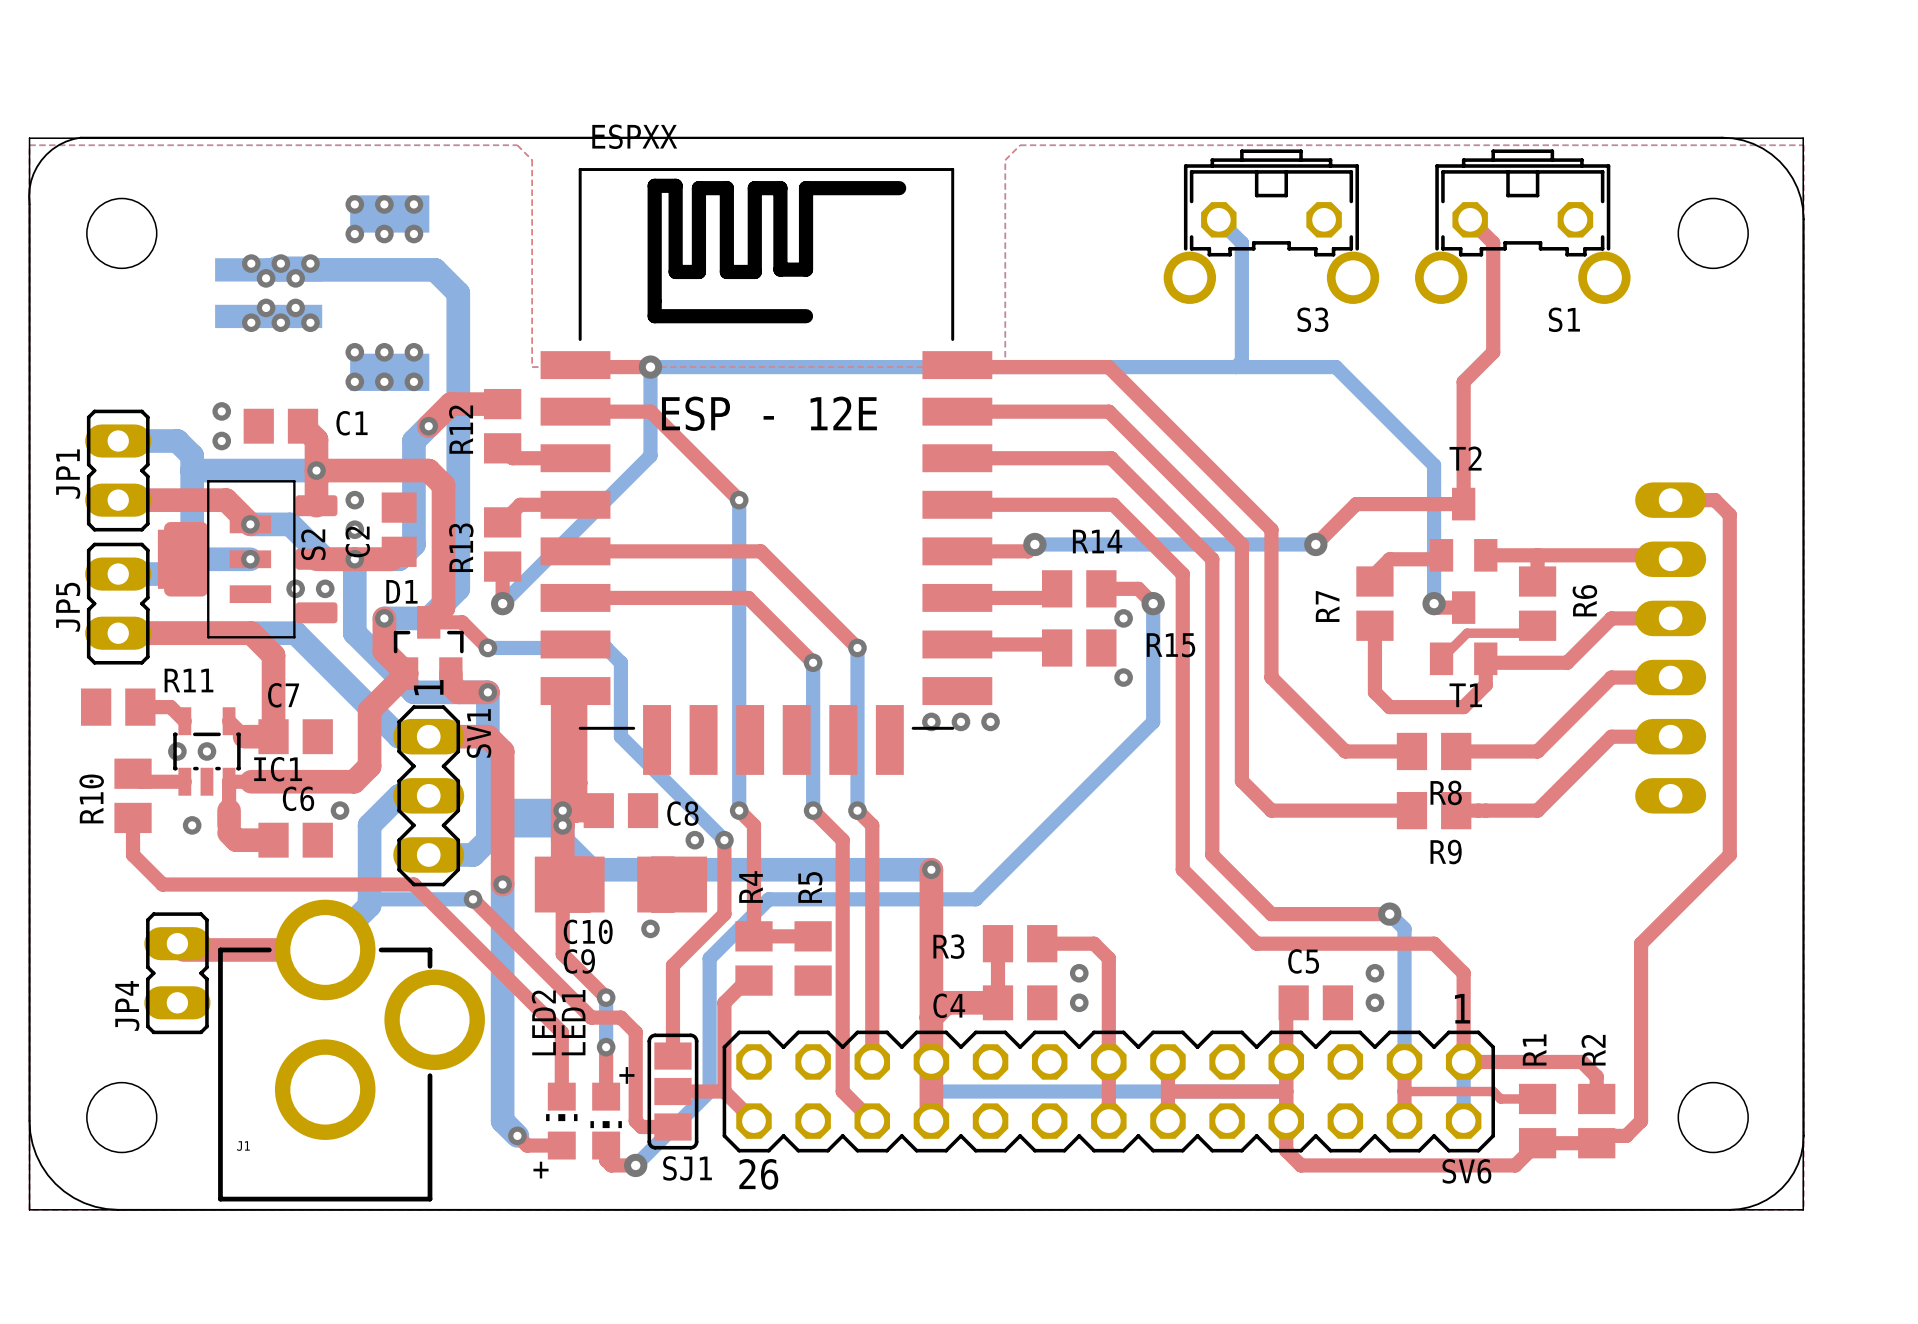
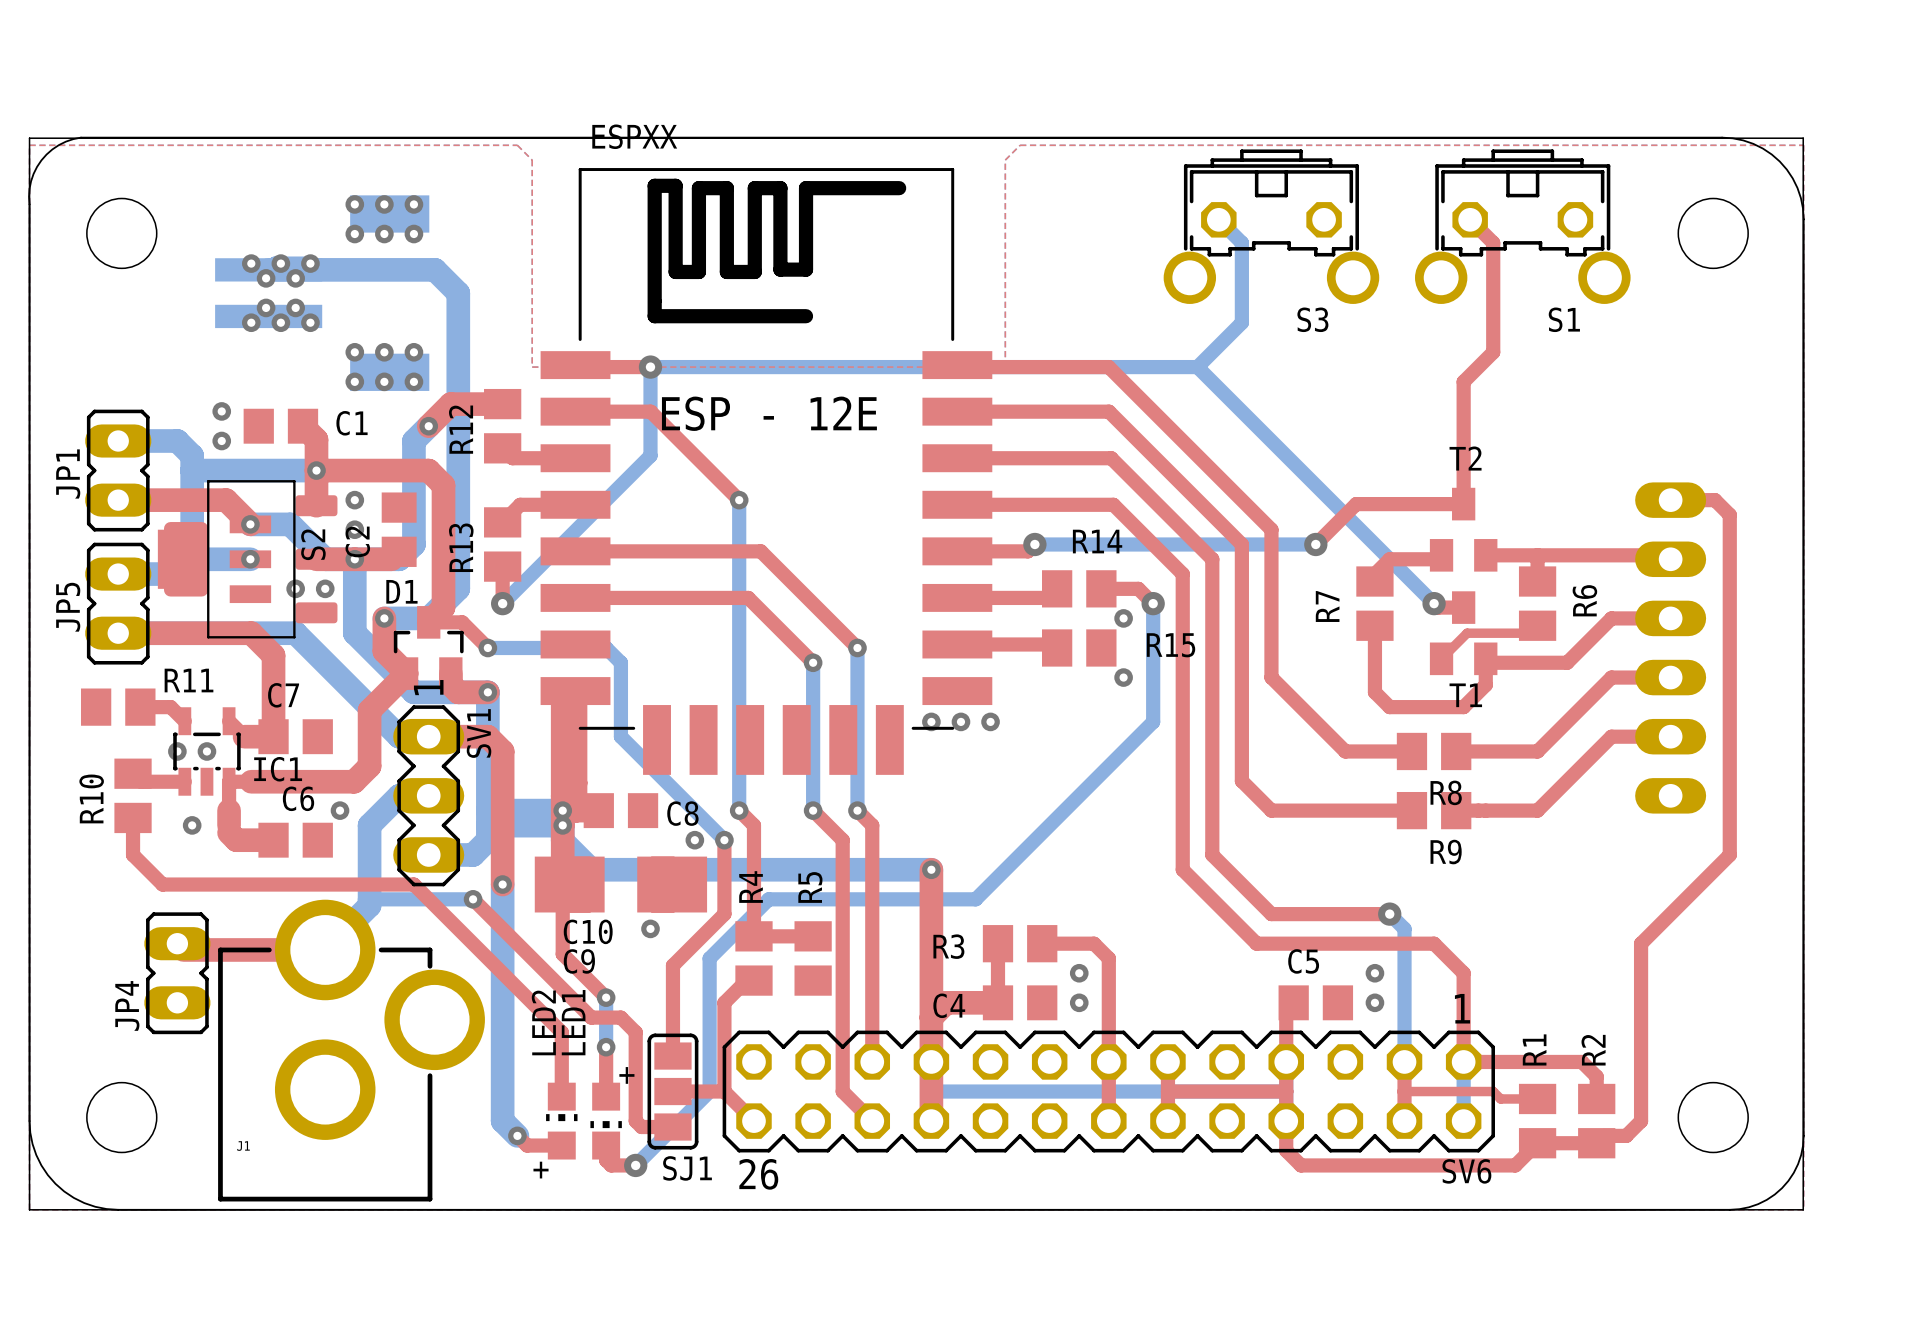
bottom track: (1241, 322) (1241, 361) (1235, 367) -> none
bottom track: (1197, 367) (1335, 367) (1434, 465) (1434, 603) -> (1241, 322) (1197, 367) (1434, 603)

